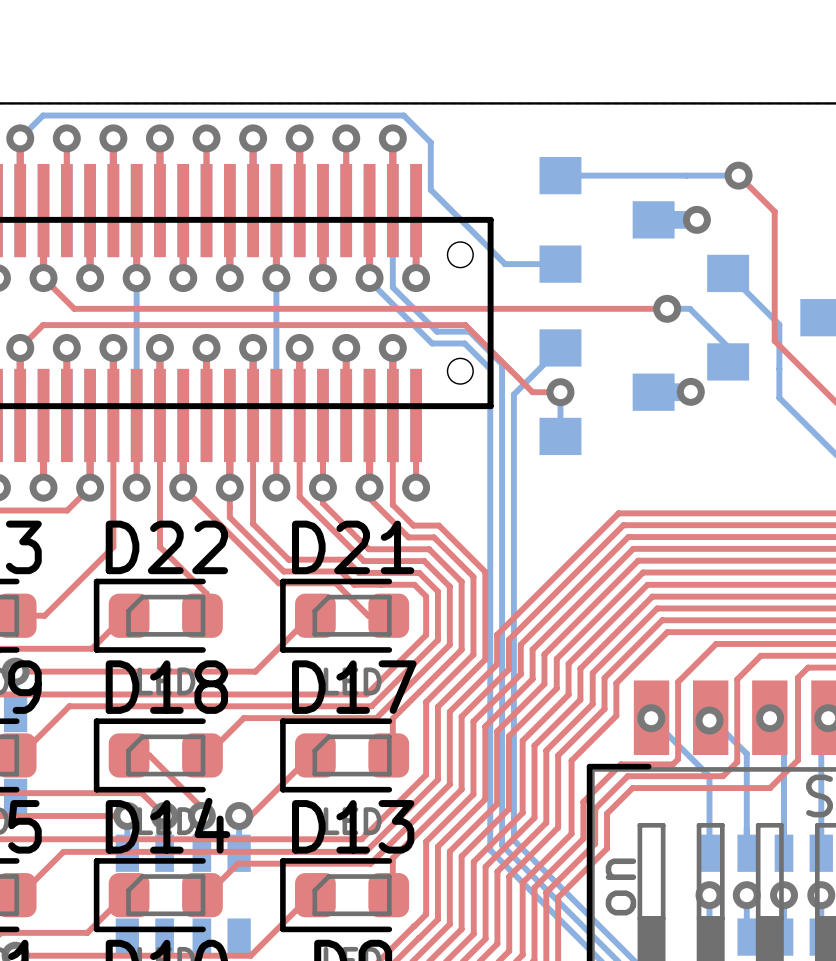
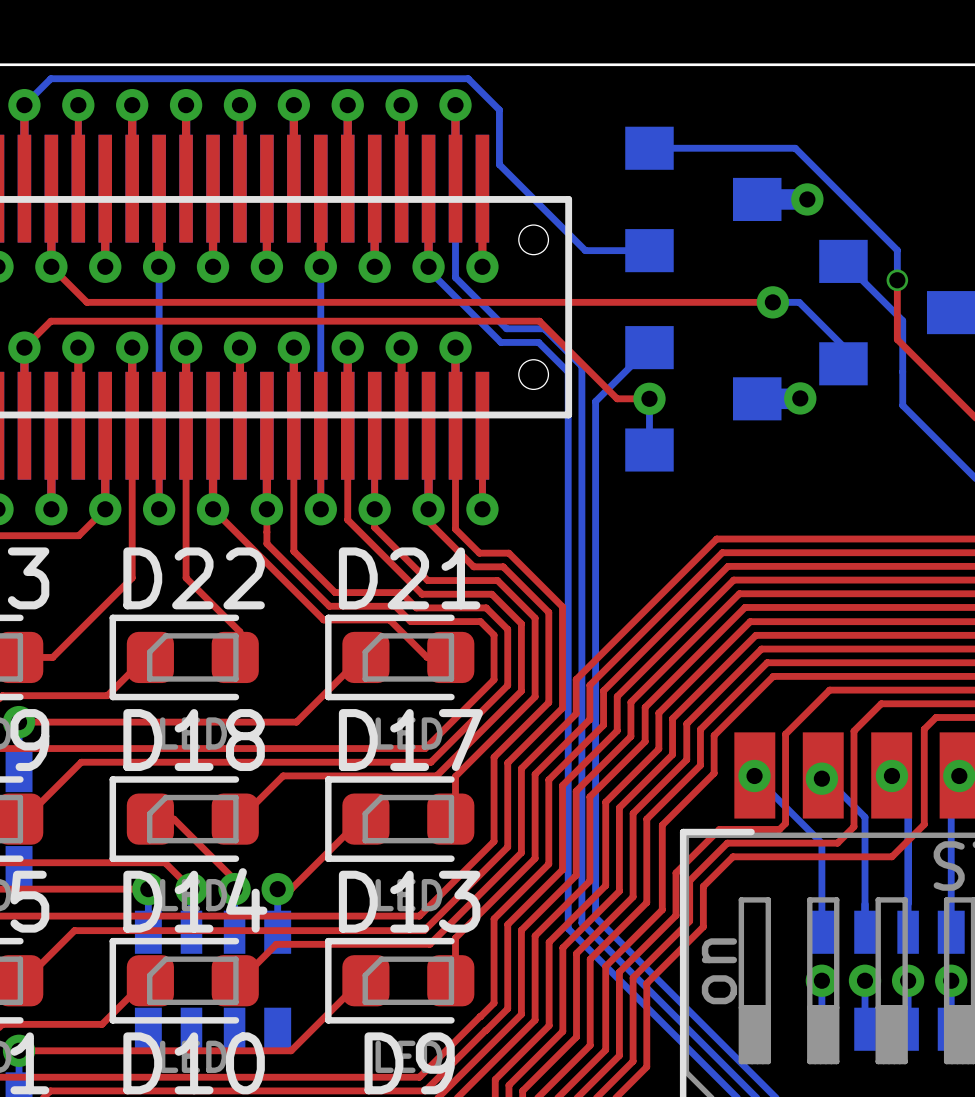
bottom track: (686, 175) (738, 175) -> (795, 148) (897, 250) (897, 280)
top track: (738, 175) (774, 211) (774, 289) -> none
via: (738, 175) -> none
via: none -> (897, 280)

